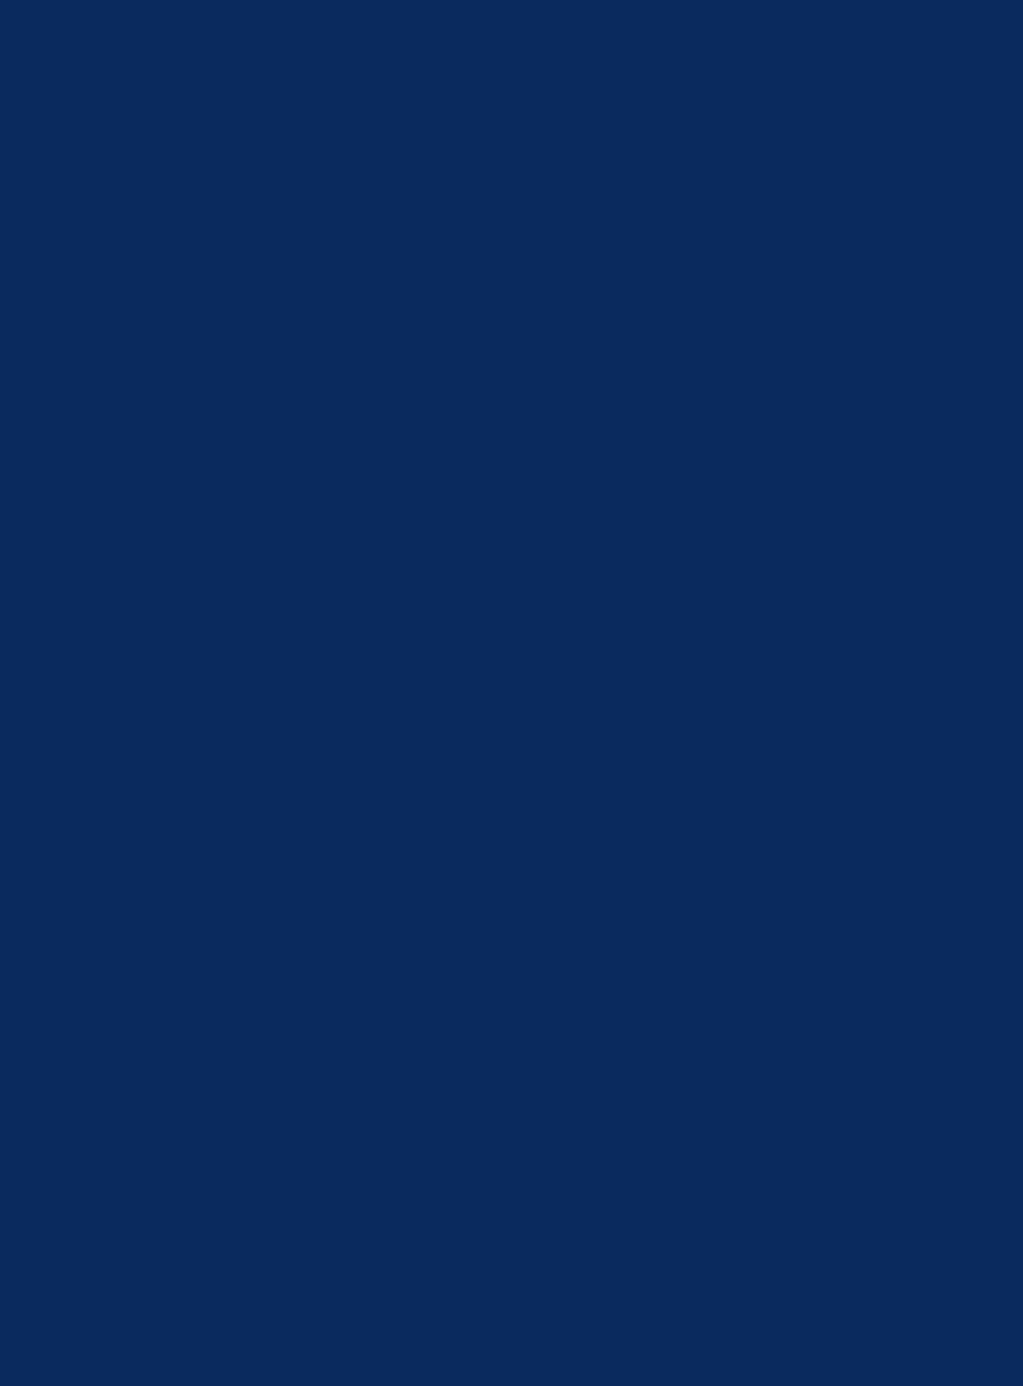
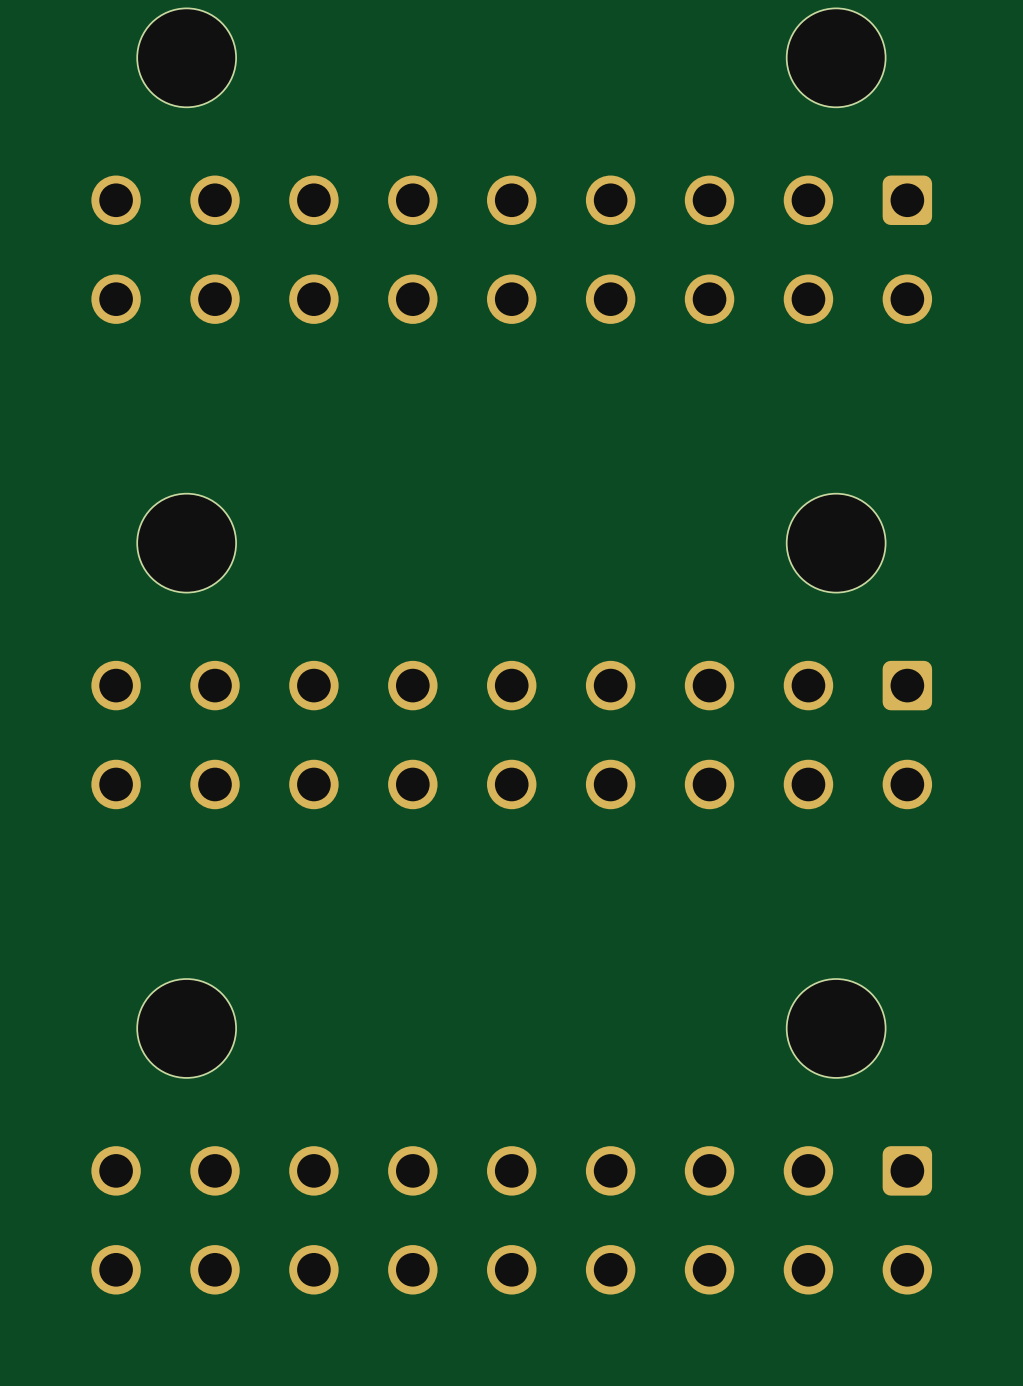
part: none -> (511, 166)
part: none -> (511, 651)
part: none -> (511, 1136)

